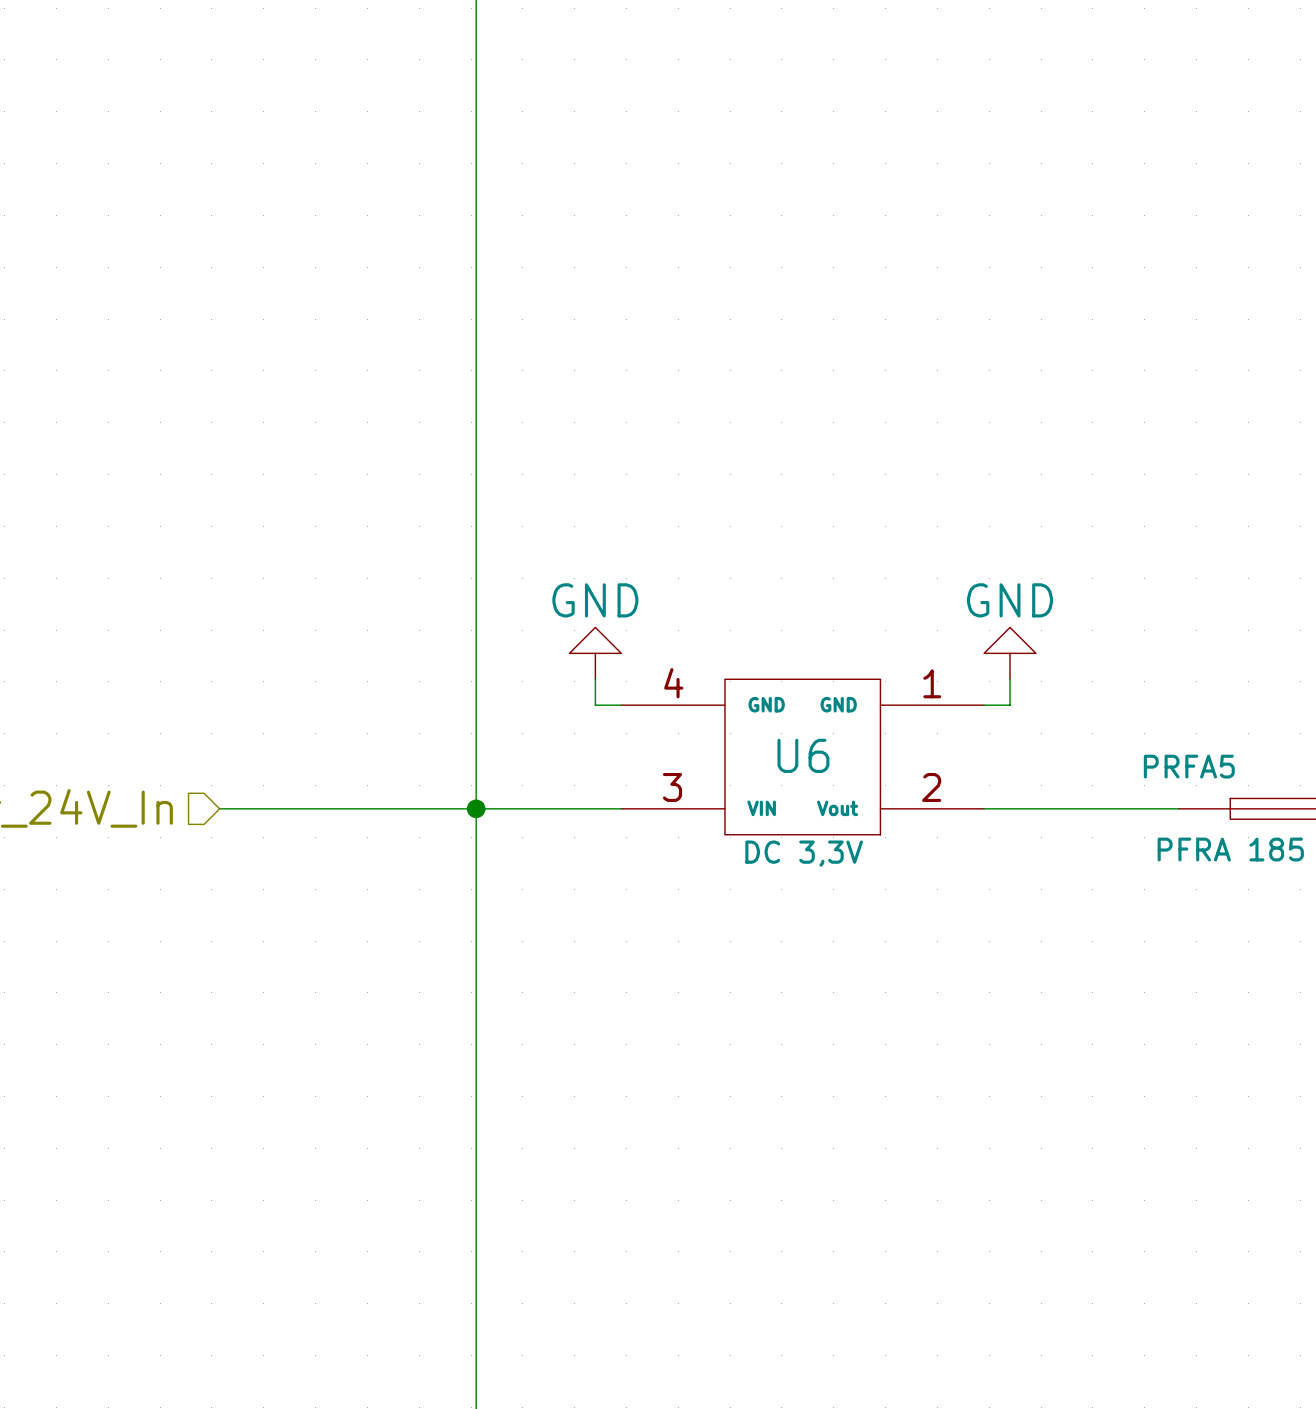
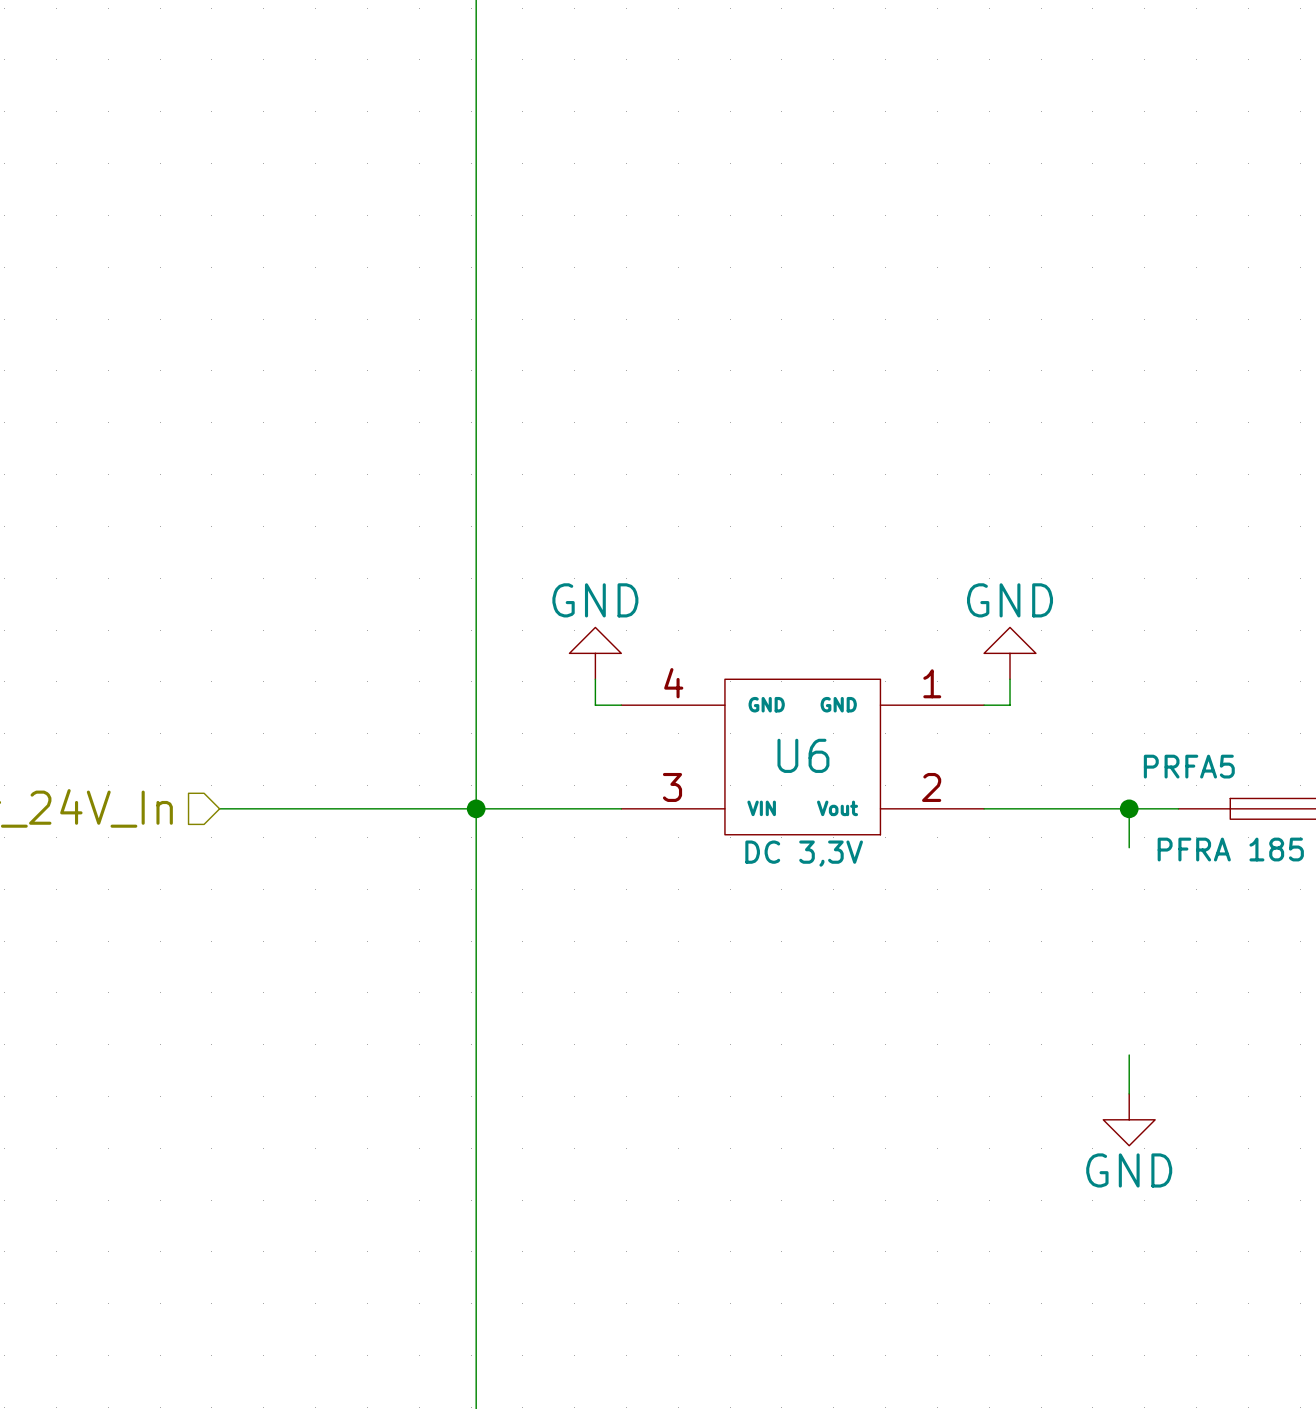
wire: none -> (1129, 808) (1129, 847)
junction: none -> (1129, 808)
wire: none -> (1129, 1055) (1129, 1093)
power symbol: none -> GND (1129, 1119)

